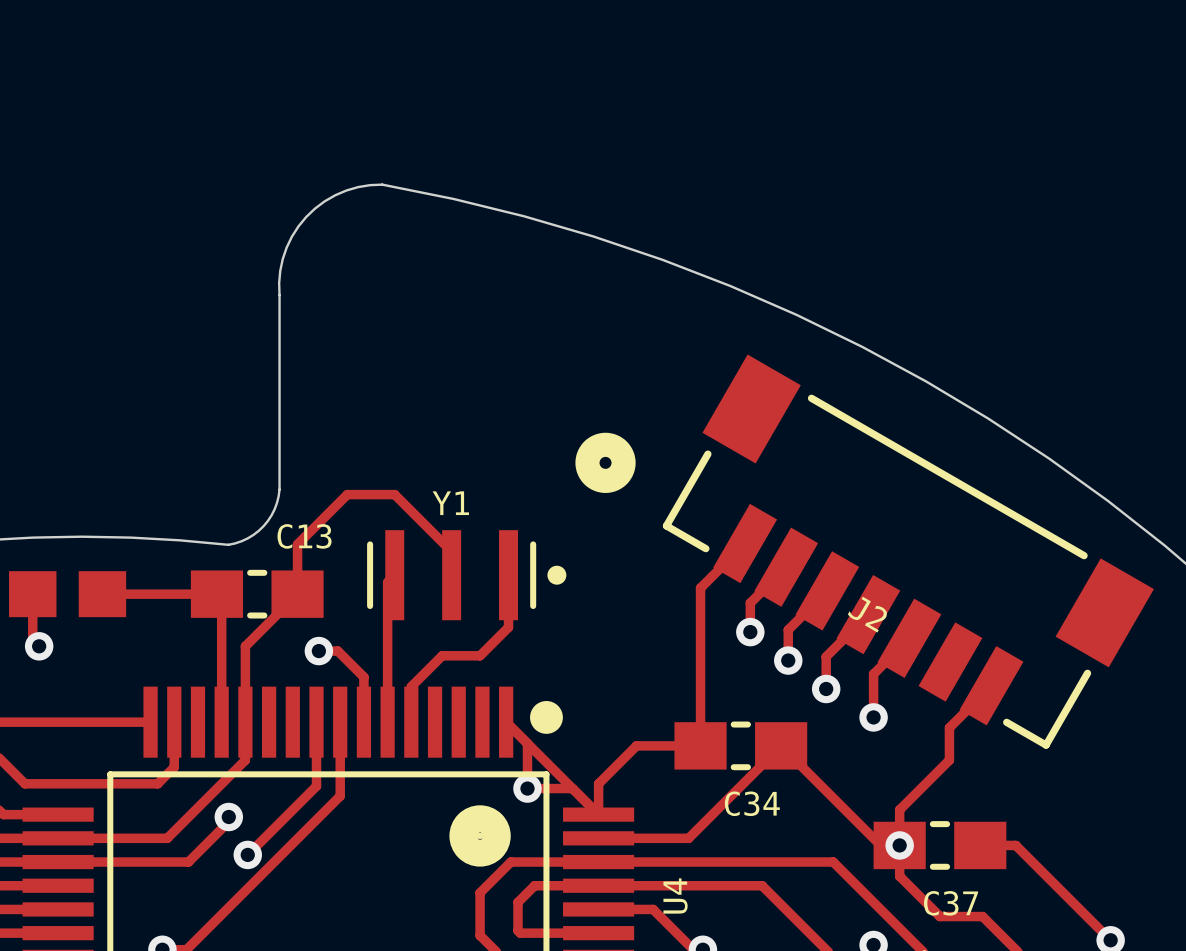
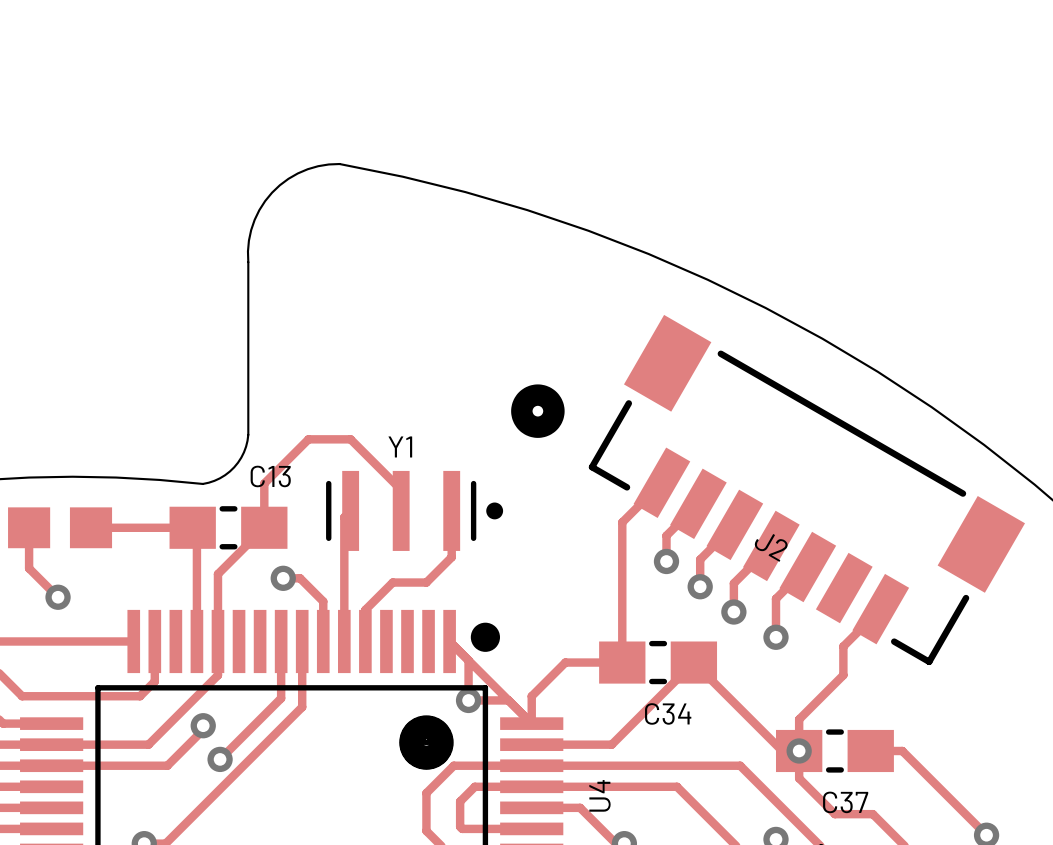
track: none -> (34, 574) (57, 597)
via position: (39, 646) -> (58, 597)

